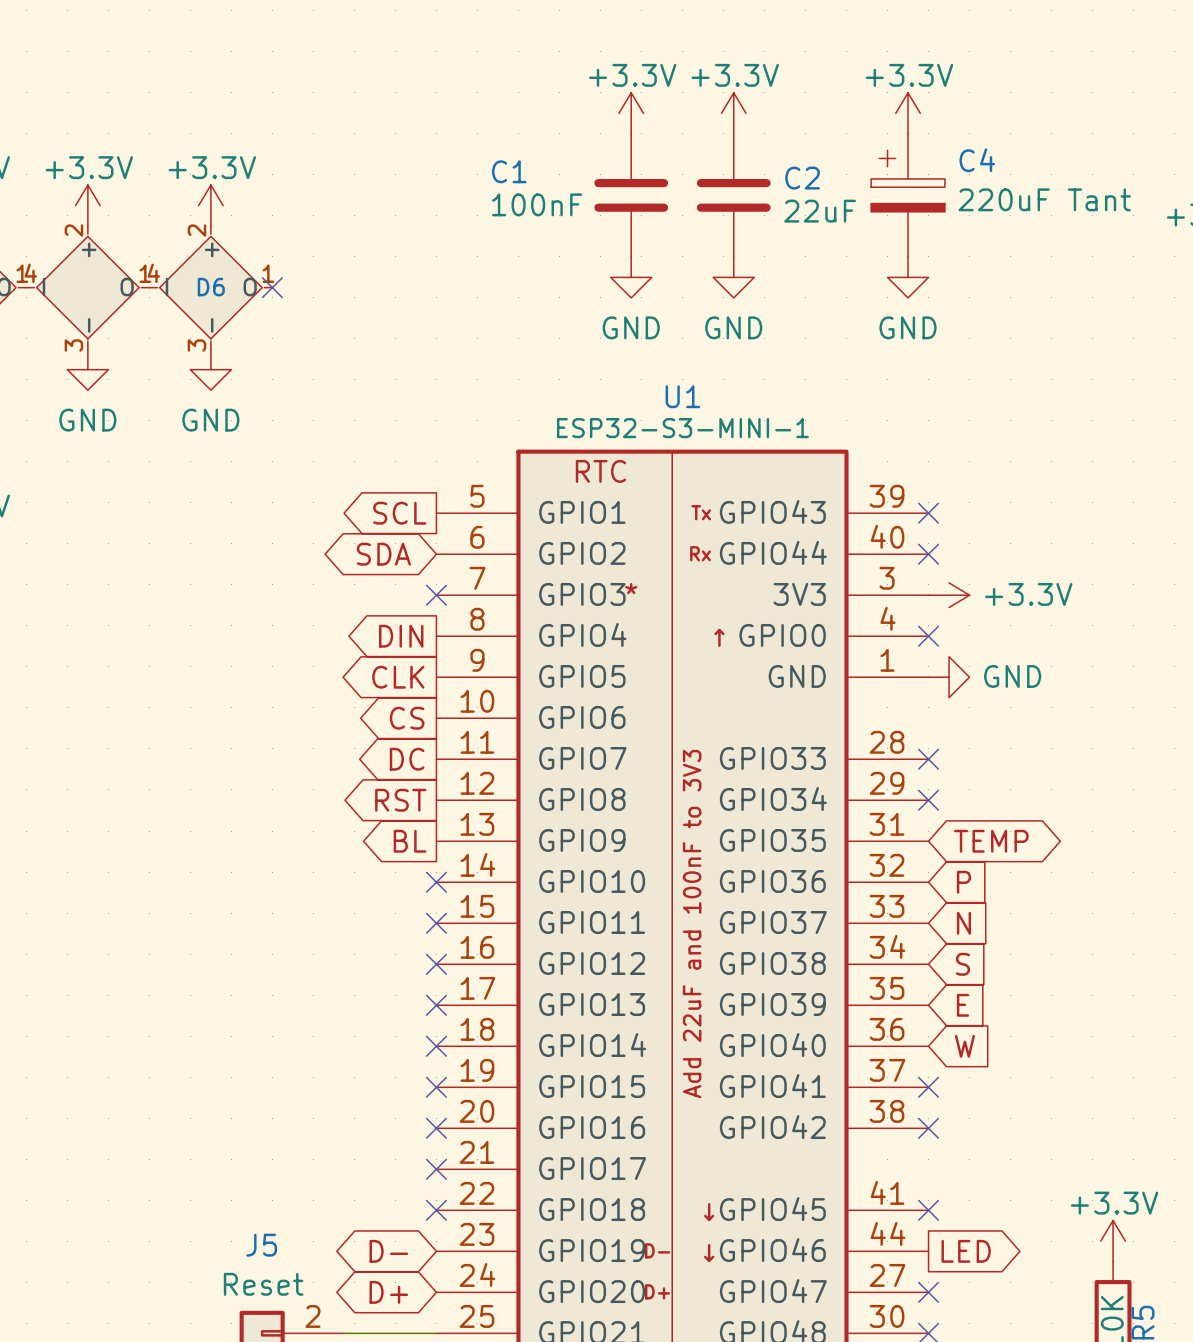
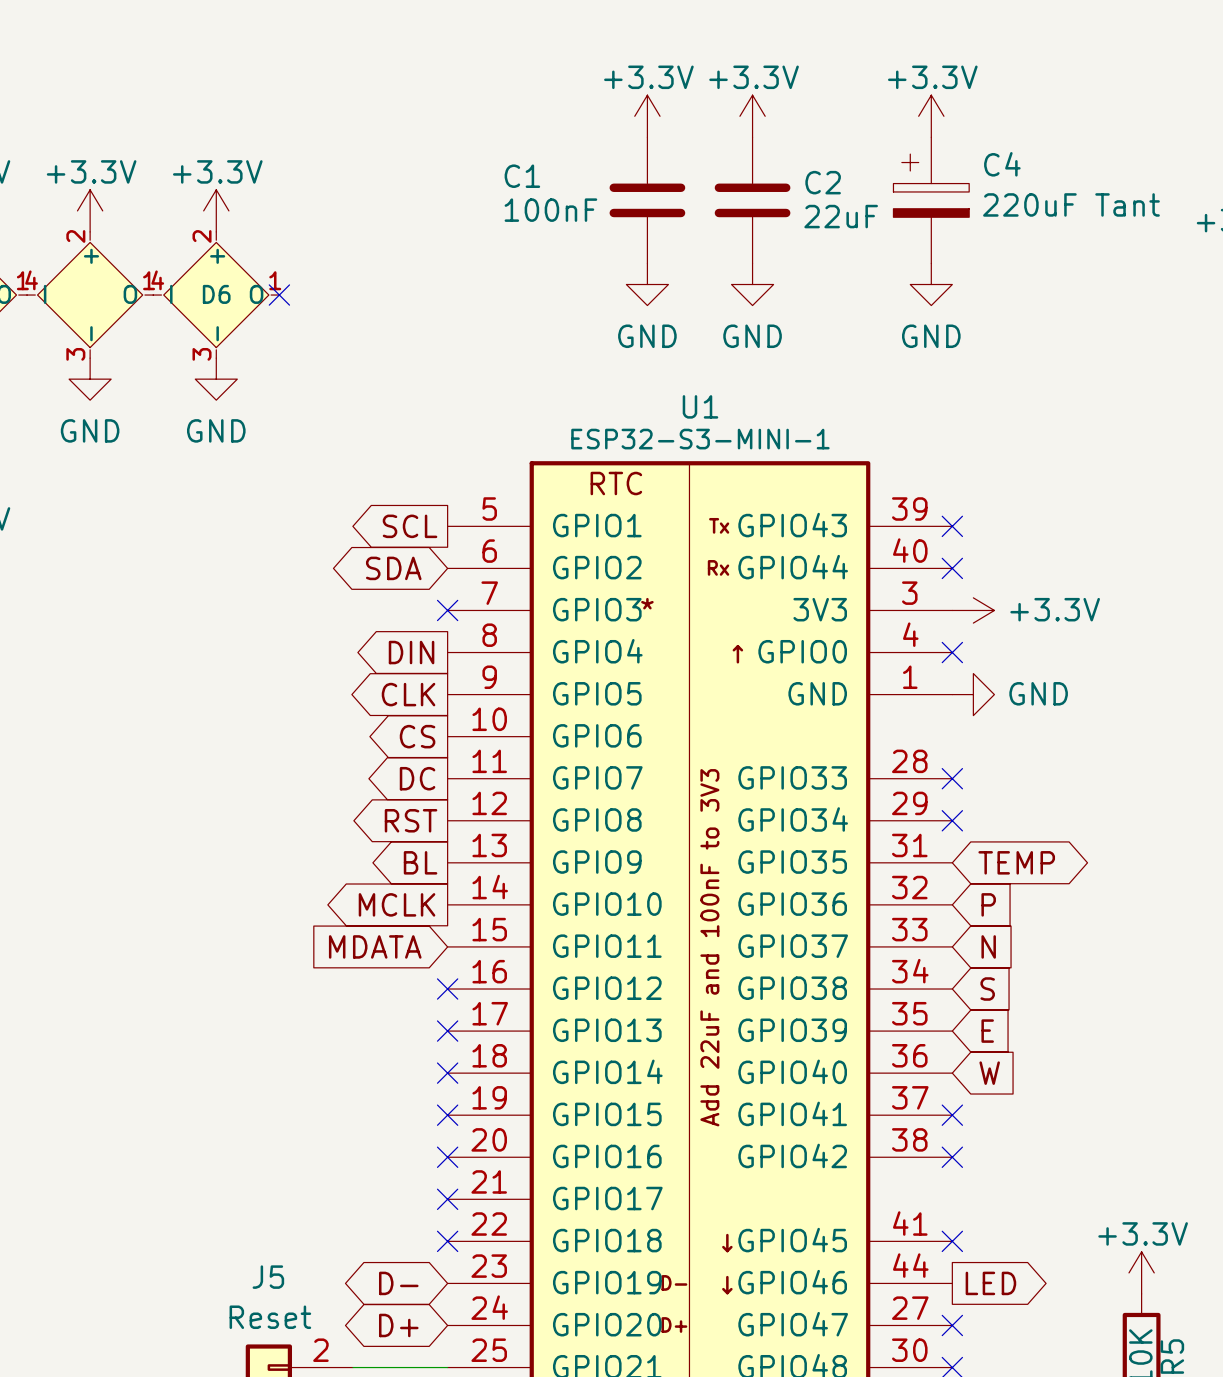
global label: none -> MCLK (397, 904)
no-connect mark: (436, 882) -> none
global label: none -> MDATA (375, 946)
no-connect mark: (436, 923) -> none

